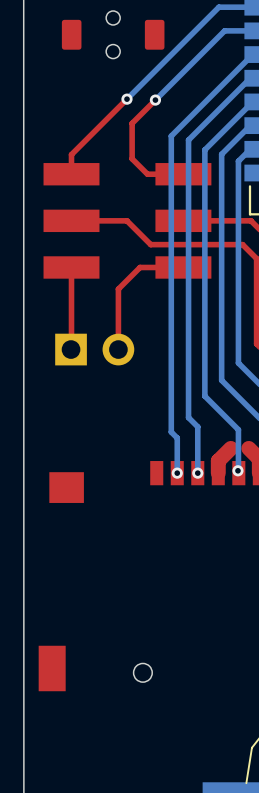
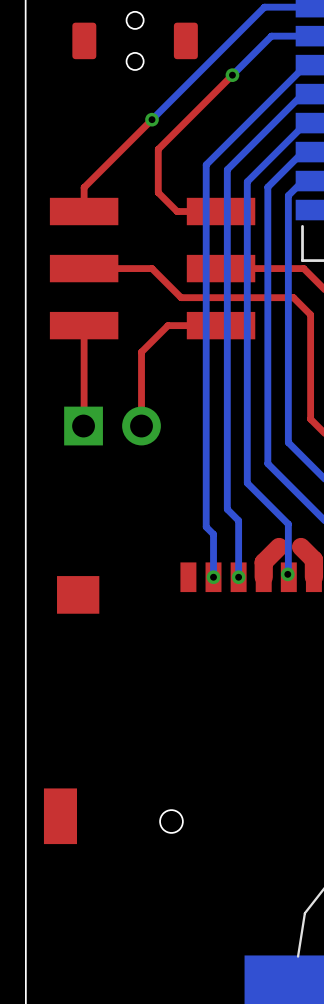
top track: none -> (232, 75) (186, 120)
bottom track: (192, 62) (155, 100) -> none
via position: (155, 100) -> (232, 75)

